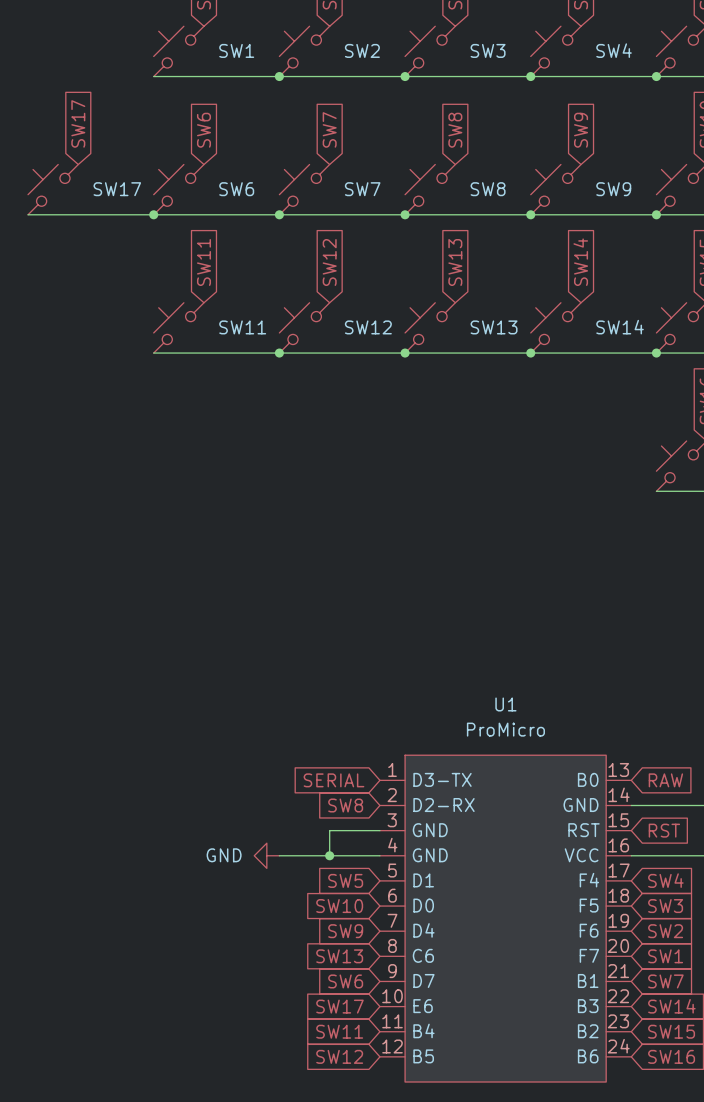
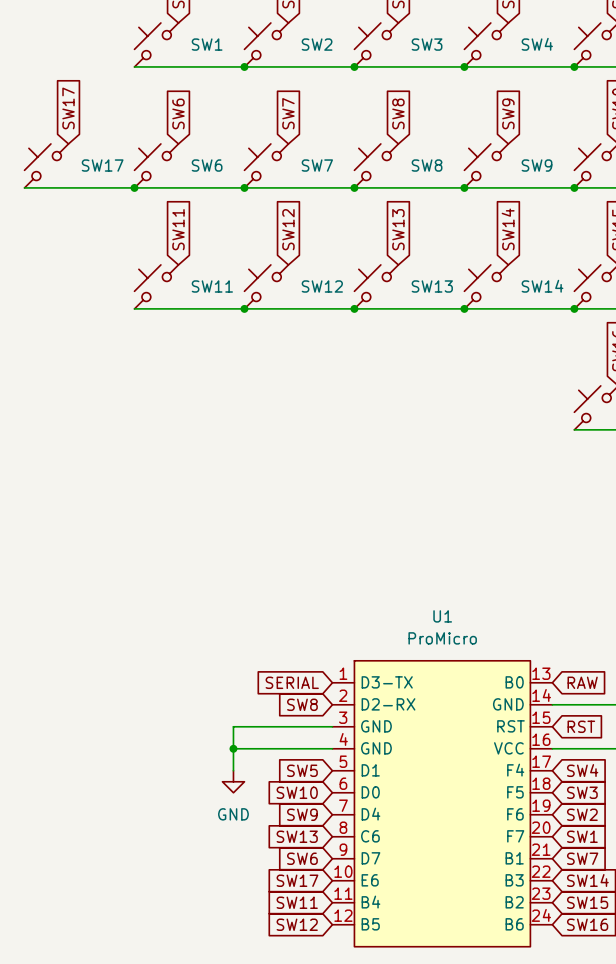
wire: (329, 830) (329, 855) -> (288, 726) (233, 726) (233, 770)
junction: none -> (233, 748)
power symbol rotation: 0° (266, 855) -> 90° counterclockwise (233, 781)
power symbol position: GND (266, 855) -> GND (233, 781)
junction: (329, 855) -> none

